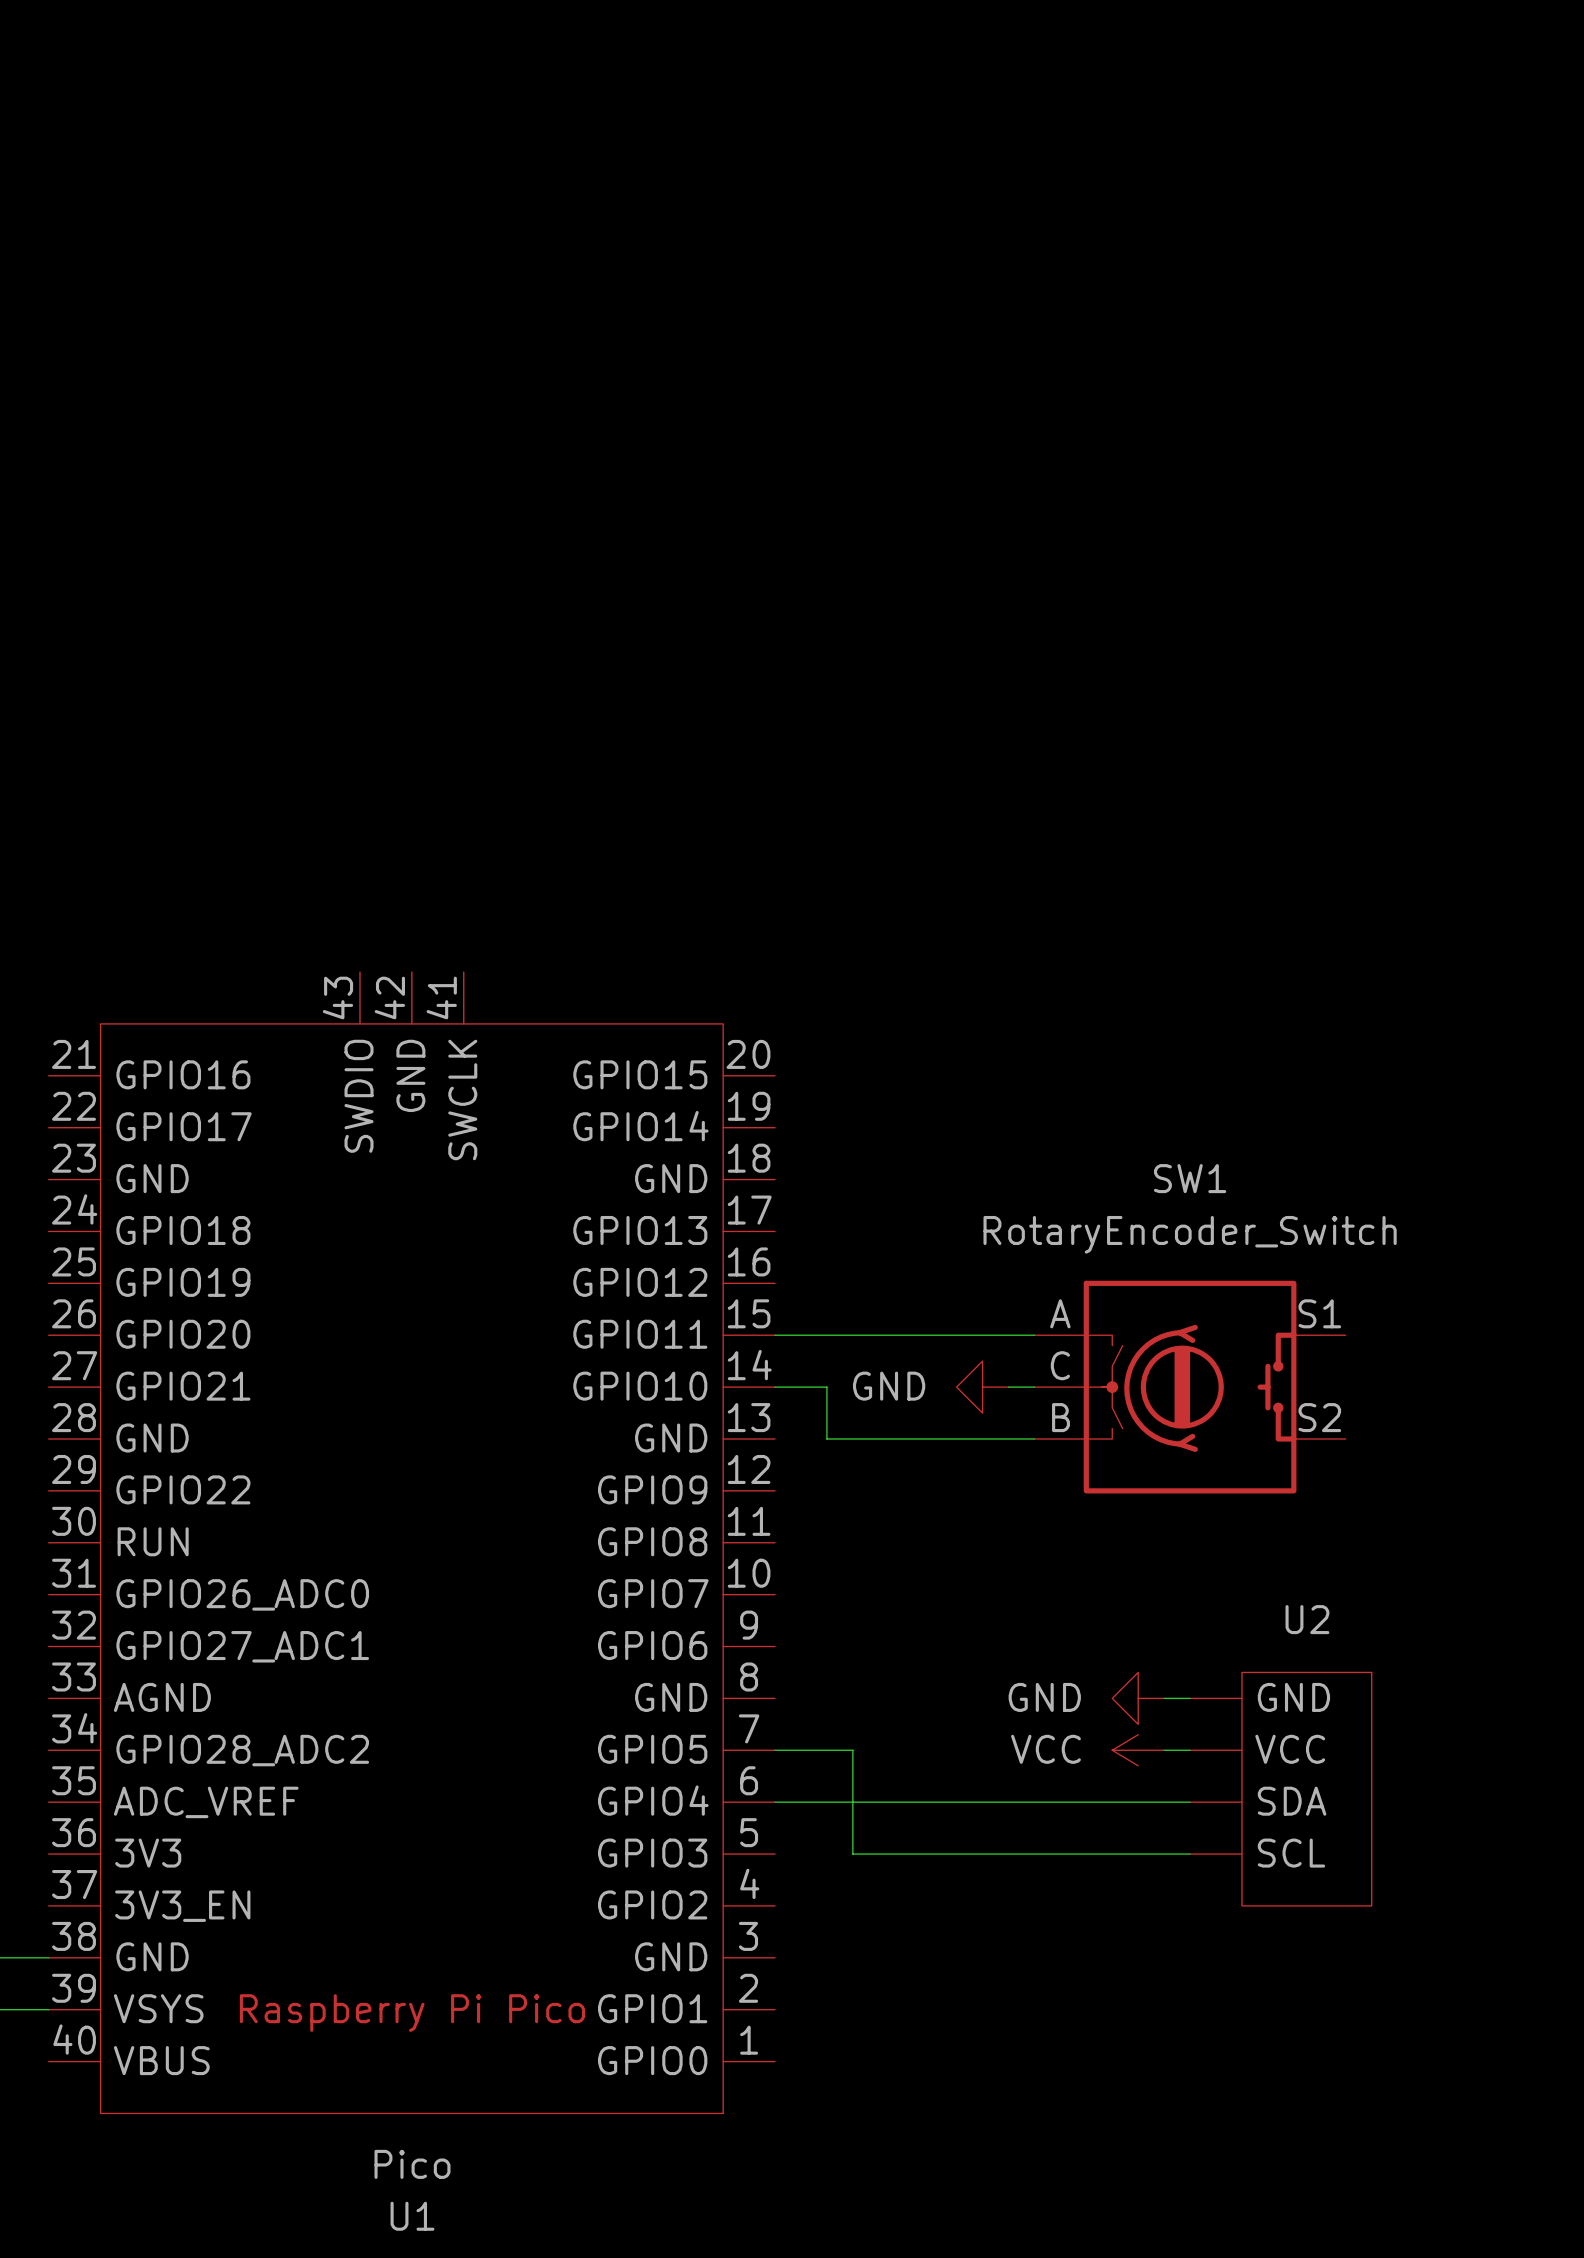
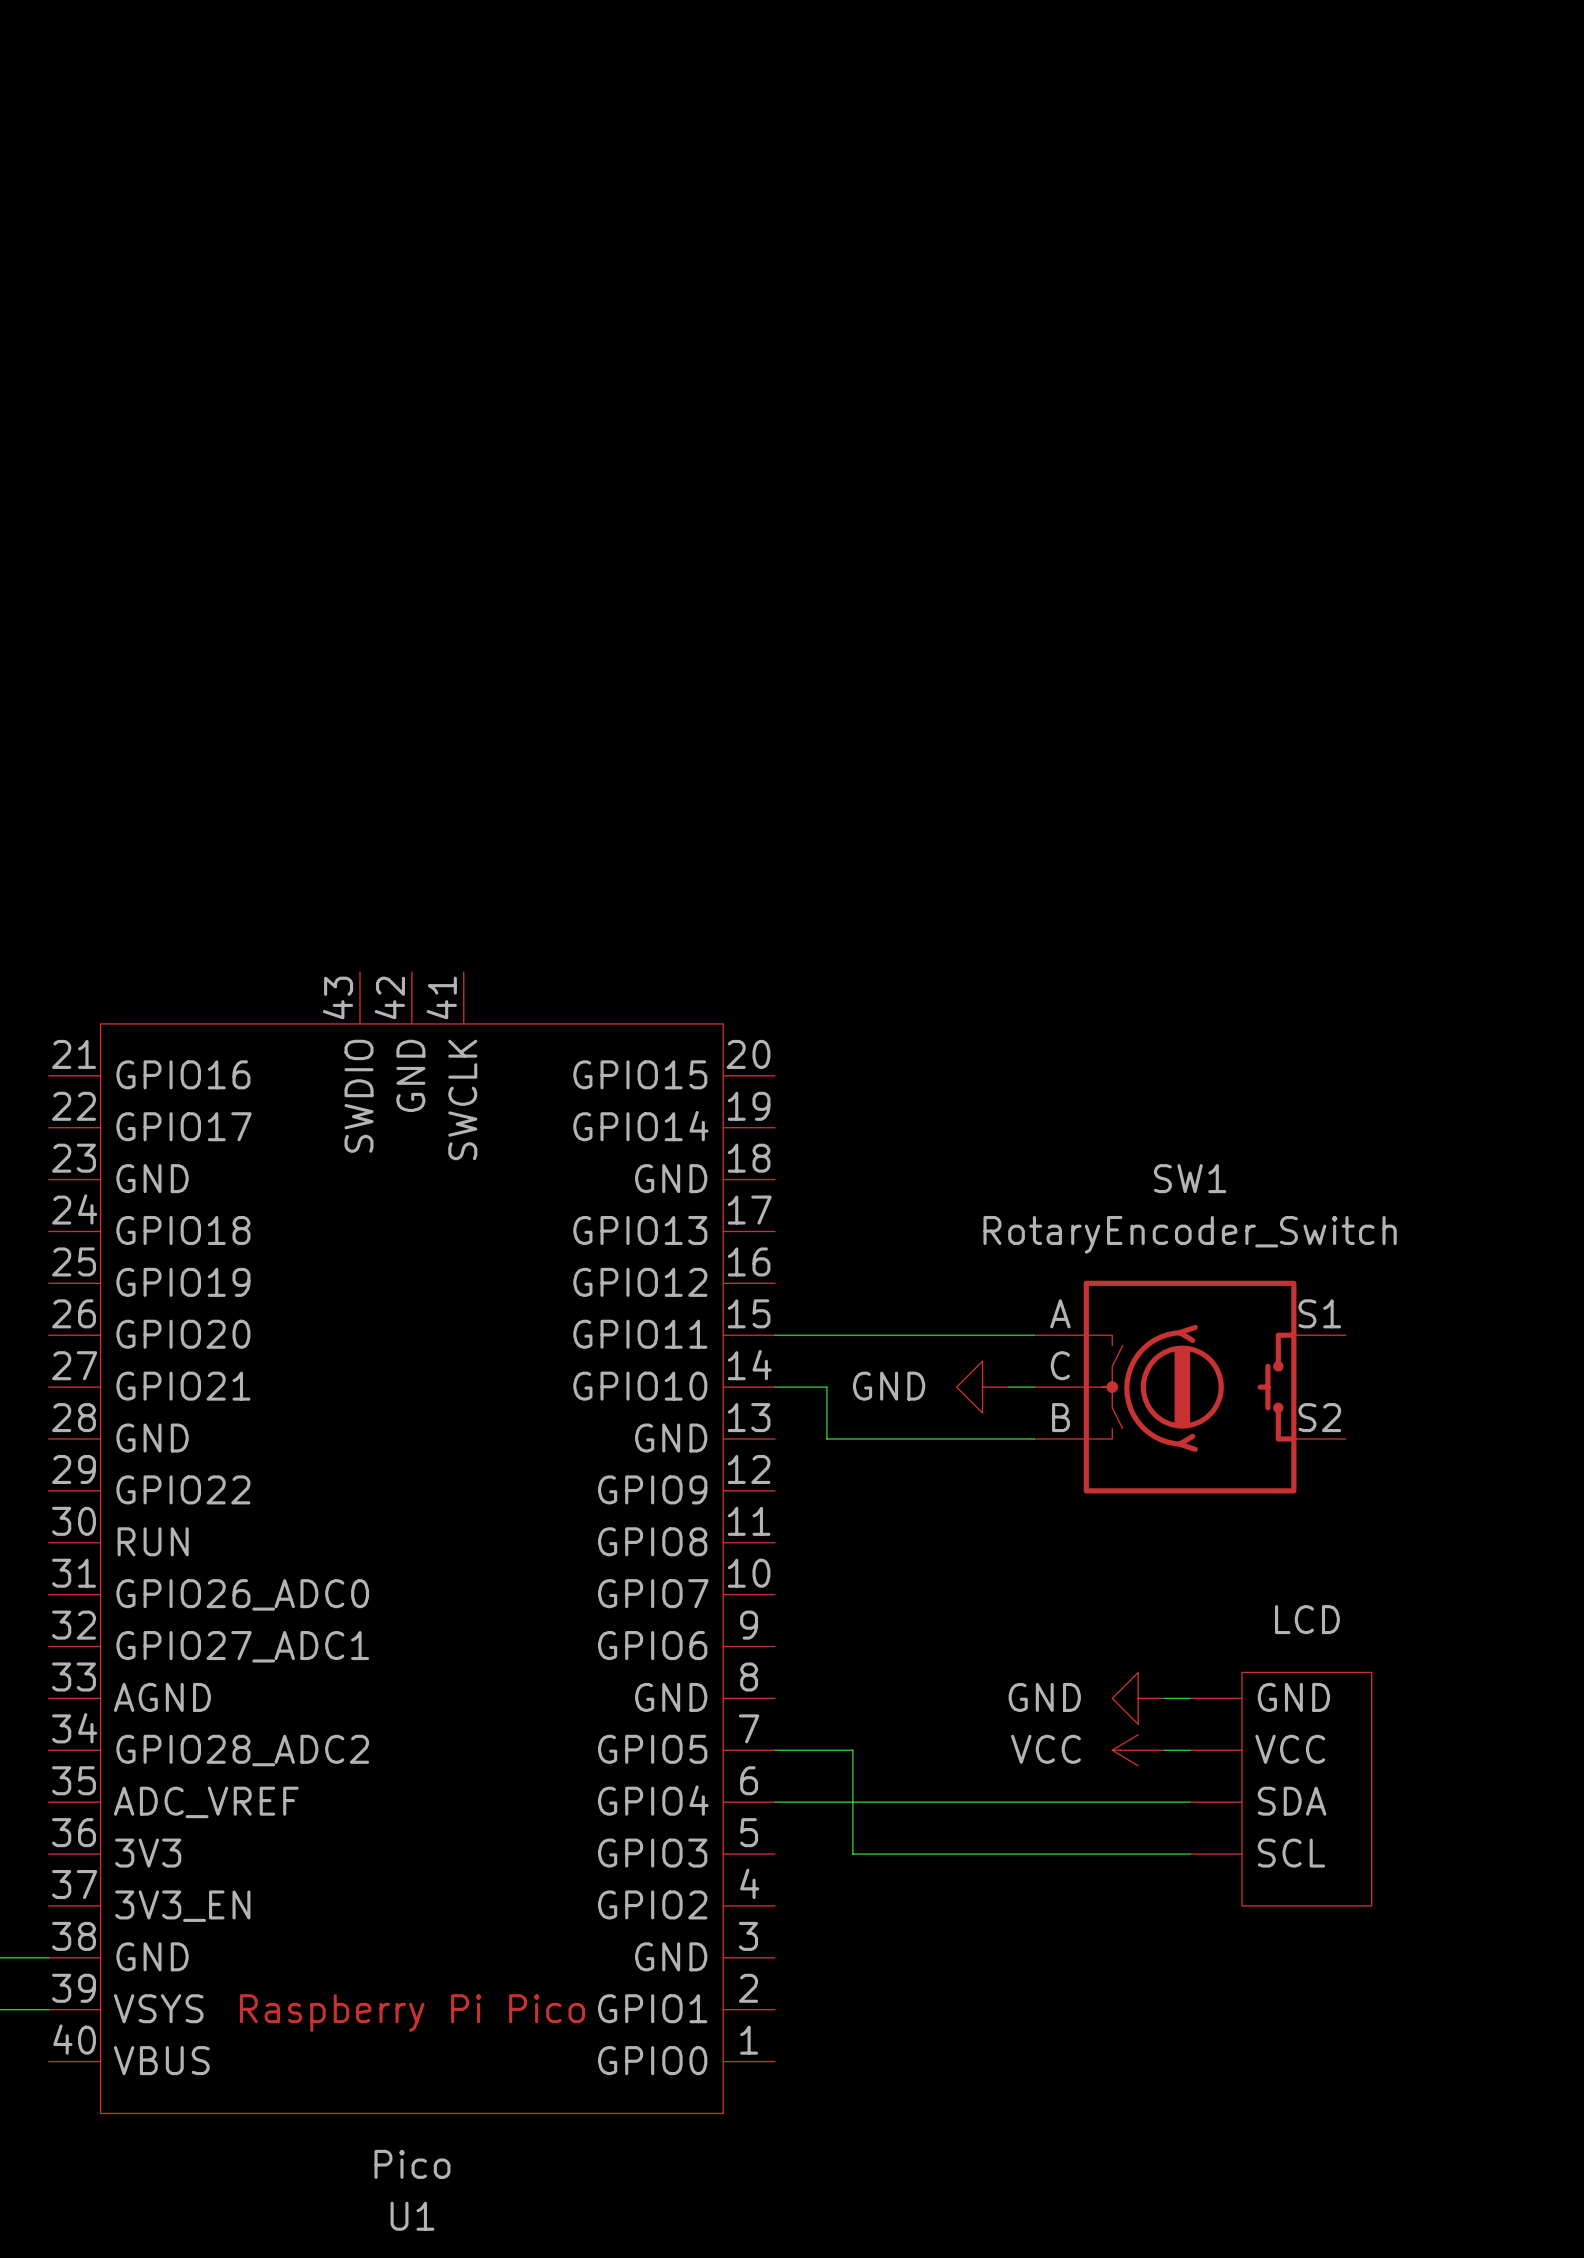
U2 name: U2 (1307, 1619) -> LCD (1307, 1619)

